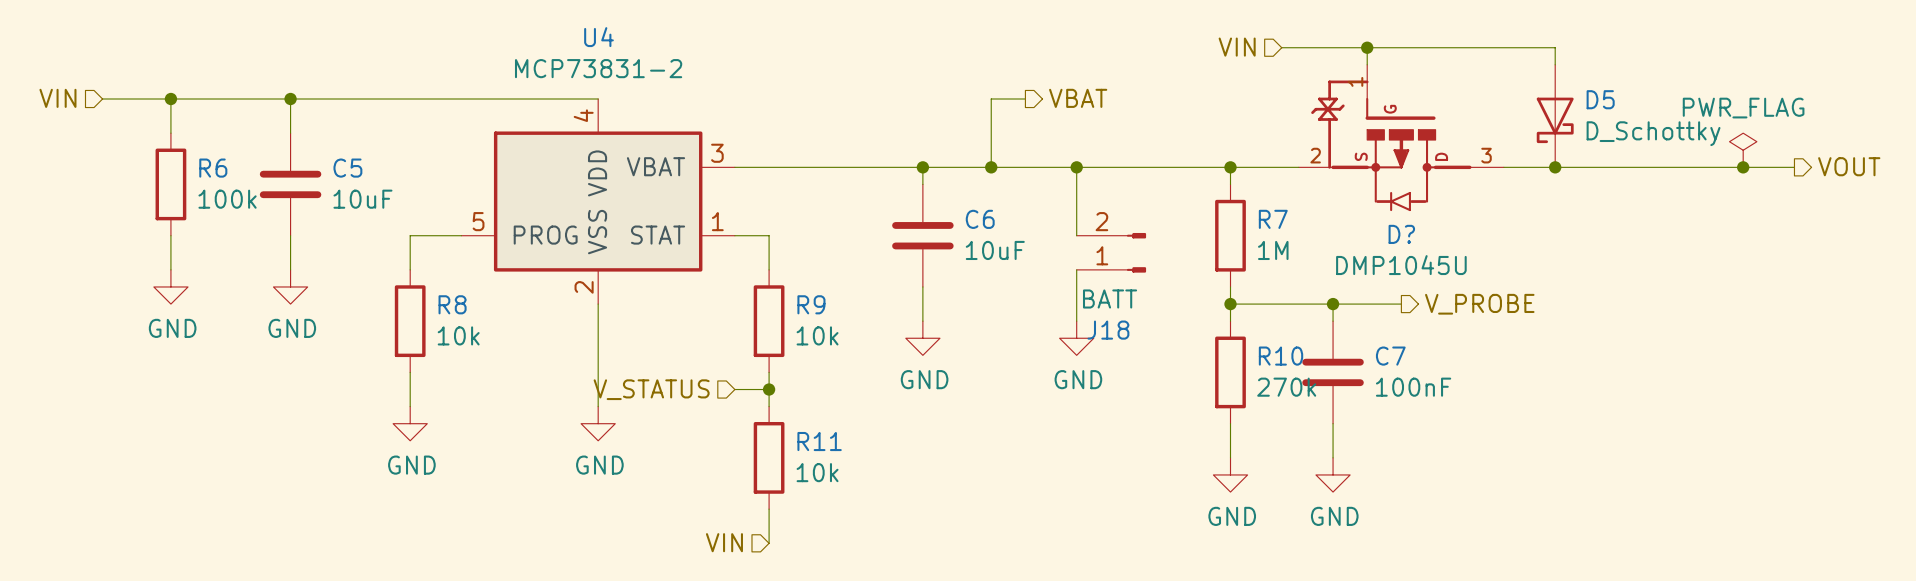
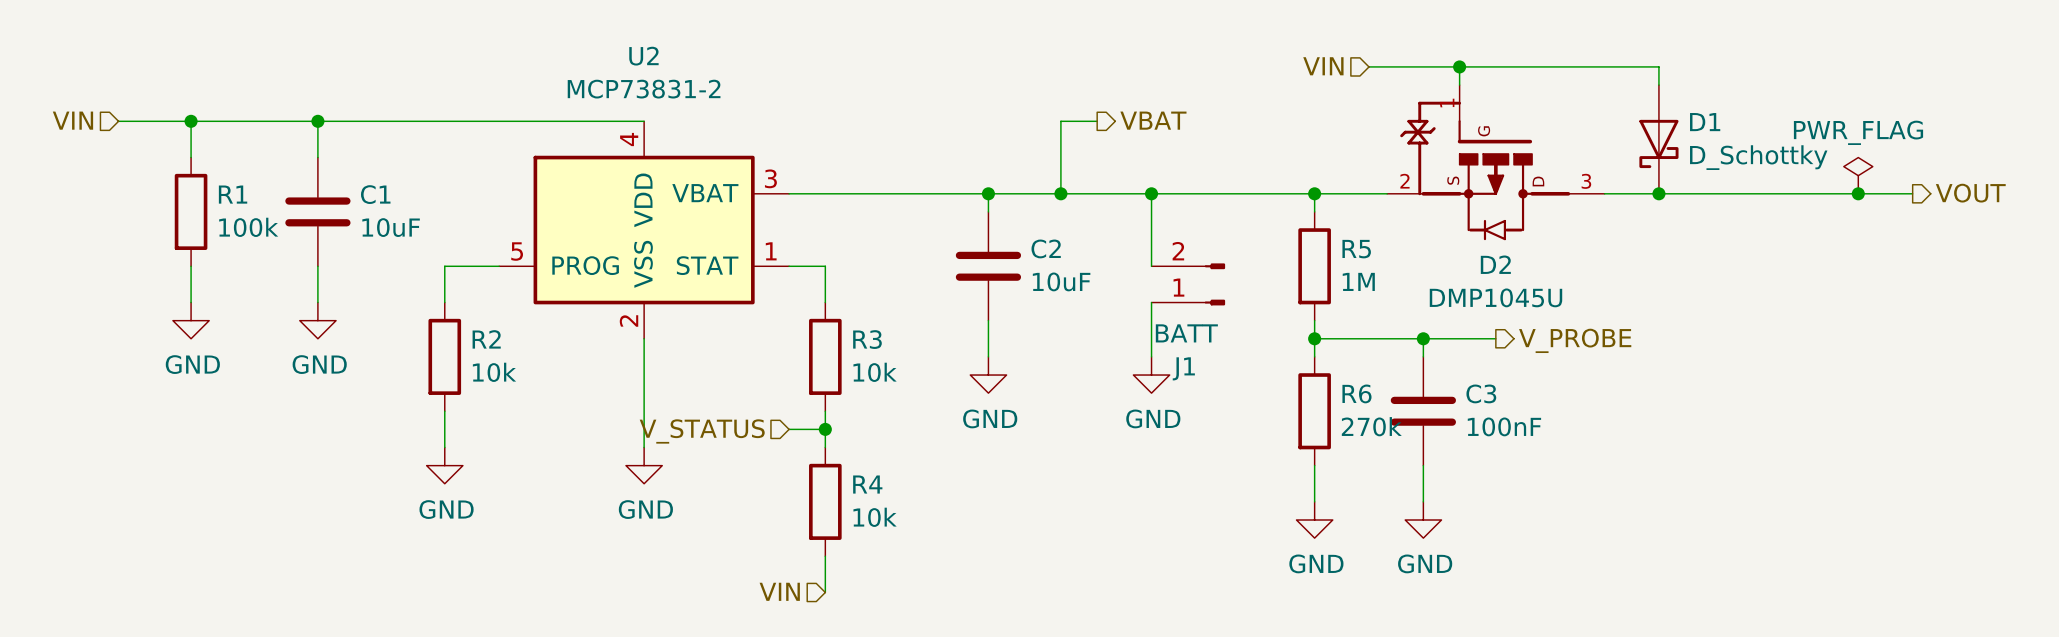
U4 name: U4 (598, 37) -> U2 (643, 56)
D5 name: D5 (1600, 99) -> D1 (1705, 122)
R6 name: R6 (213, 168) -> R1 (233, 194)
C5 name: C5 (347, 168) -> C1 (375, 194)
C6 name: C6 (980, 219) -> C2 (1046, 248)
R7 name: R7 (1273, 219) -> R5 (1356, 249)
D? name: D? (1401, 234) -> D2 (1495, 264)
R8 name: R8 (452, 304) -> R2 (486, 339)
R9 name: R9 (811, 304) -> R3 (867, 339)
J18 name: J18 (1108, 330) -> J1 (1183, 368)
R10 name: R10 (1281, 356) -> R6 (1356, 393)
C7 name: C7 (1390, 356) -> C3 (1481, 393)
R11 name: R11 (819, 441) -> R4 (867, 484)

